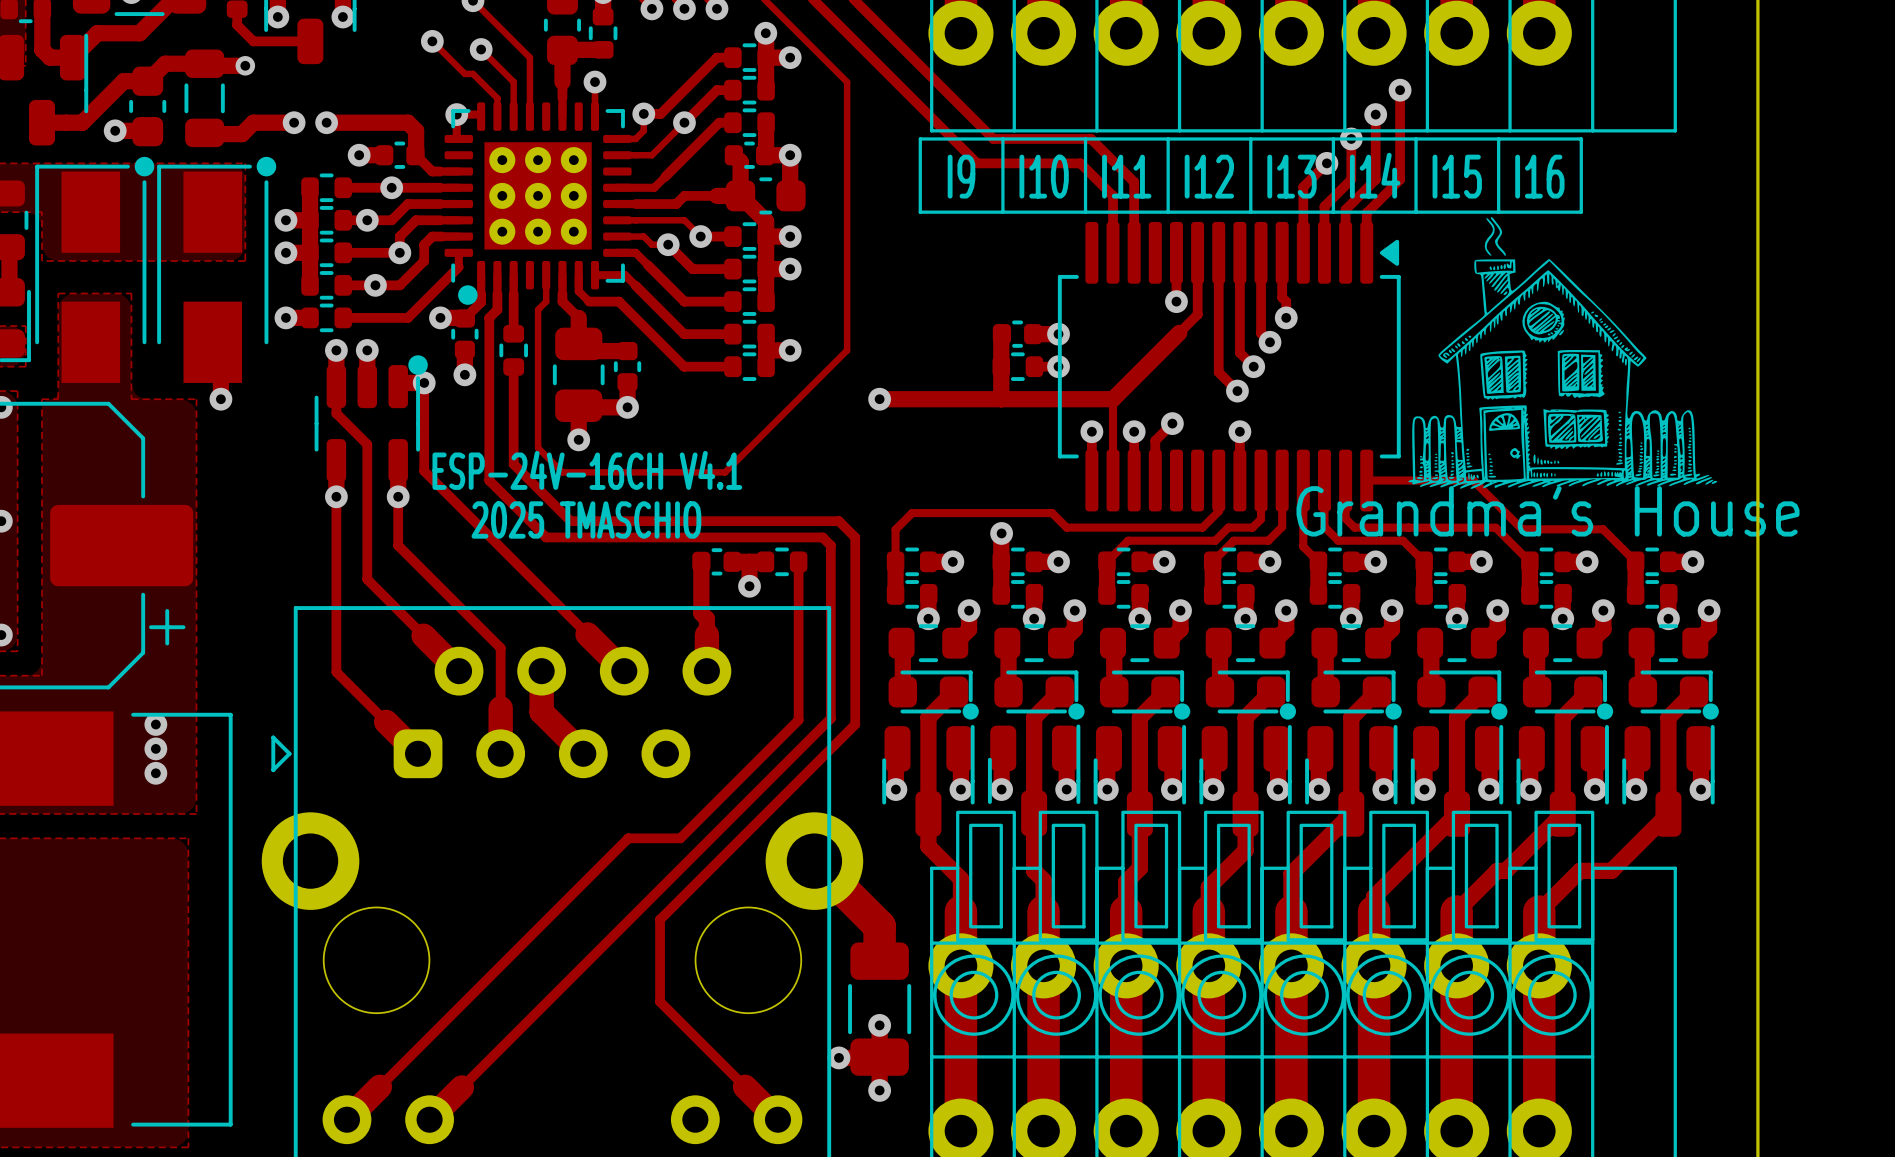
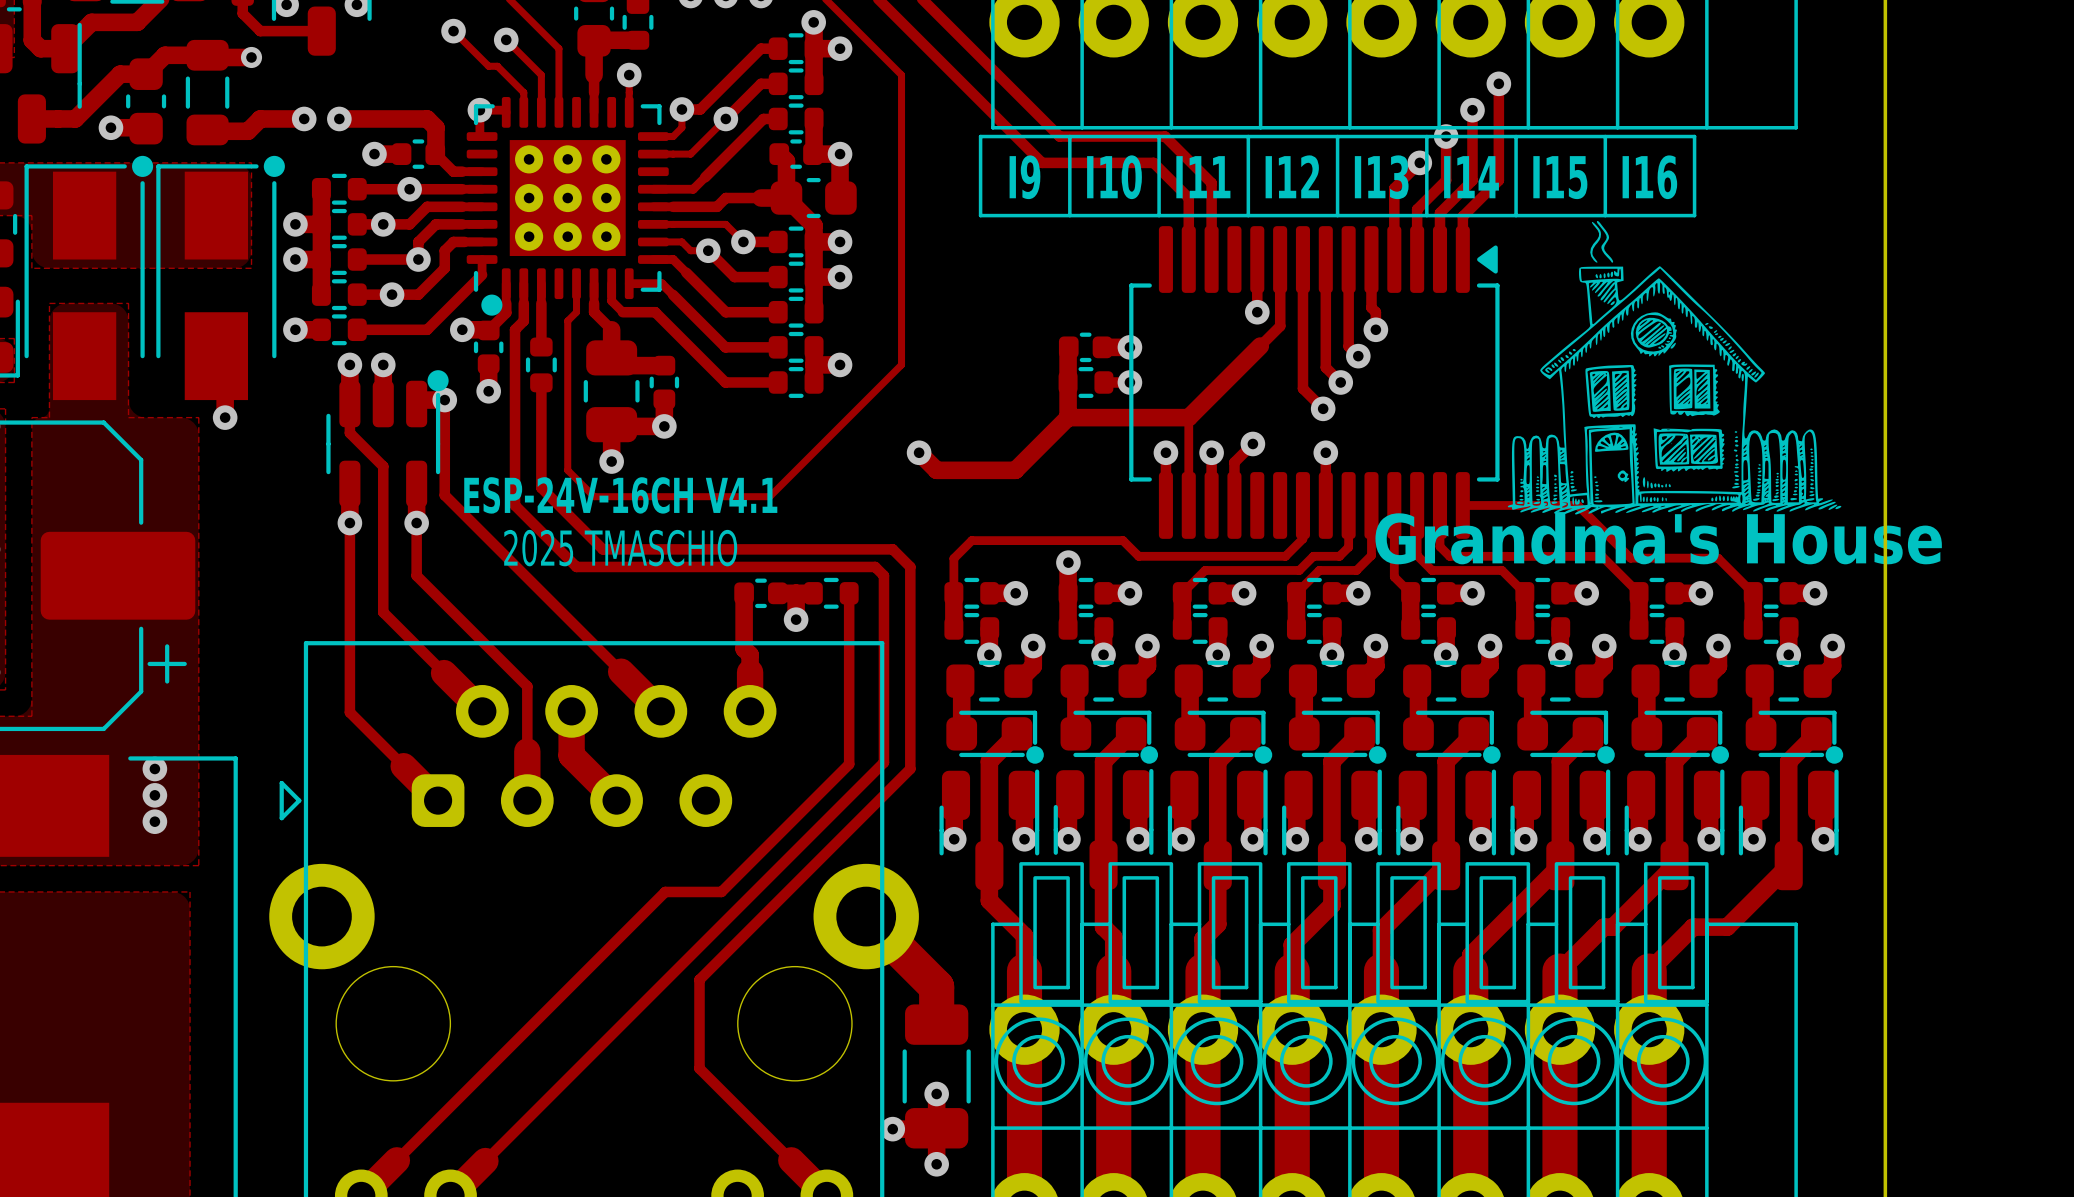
track: (879, 399) (1001, 399) -> (919, 452) (936, 470) (1015, 470) (1068, 417)
via position: (879, 399) -> (919, 452)

